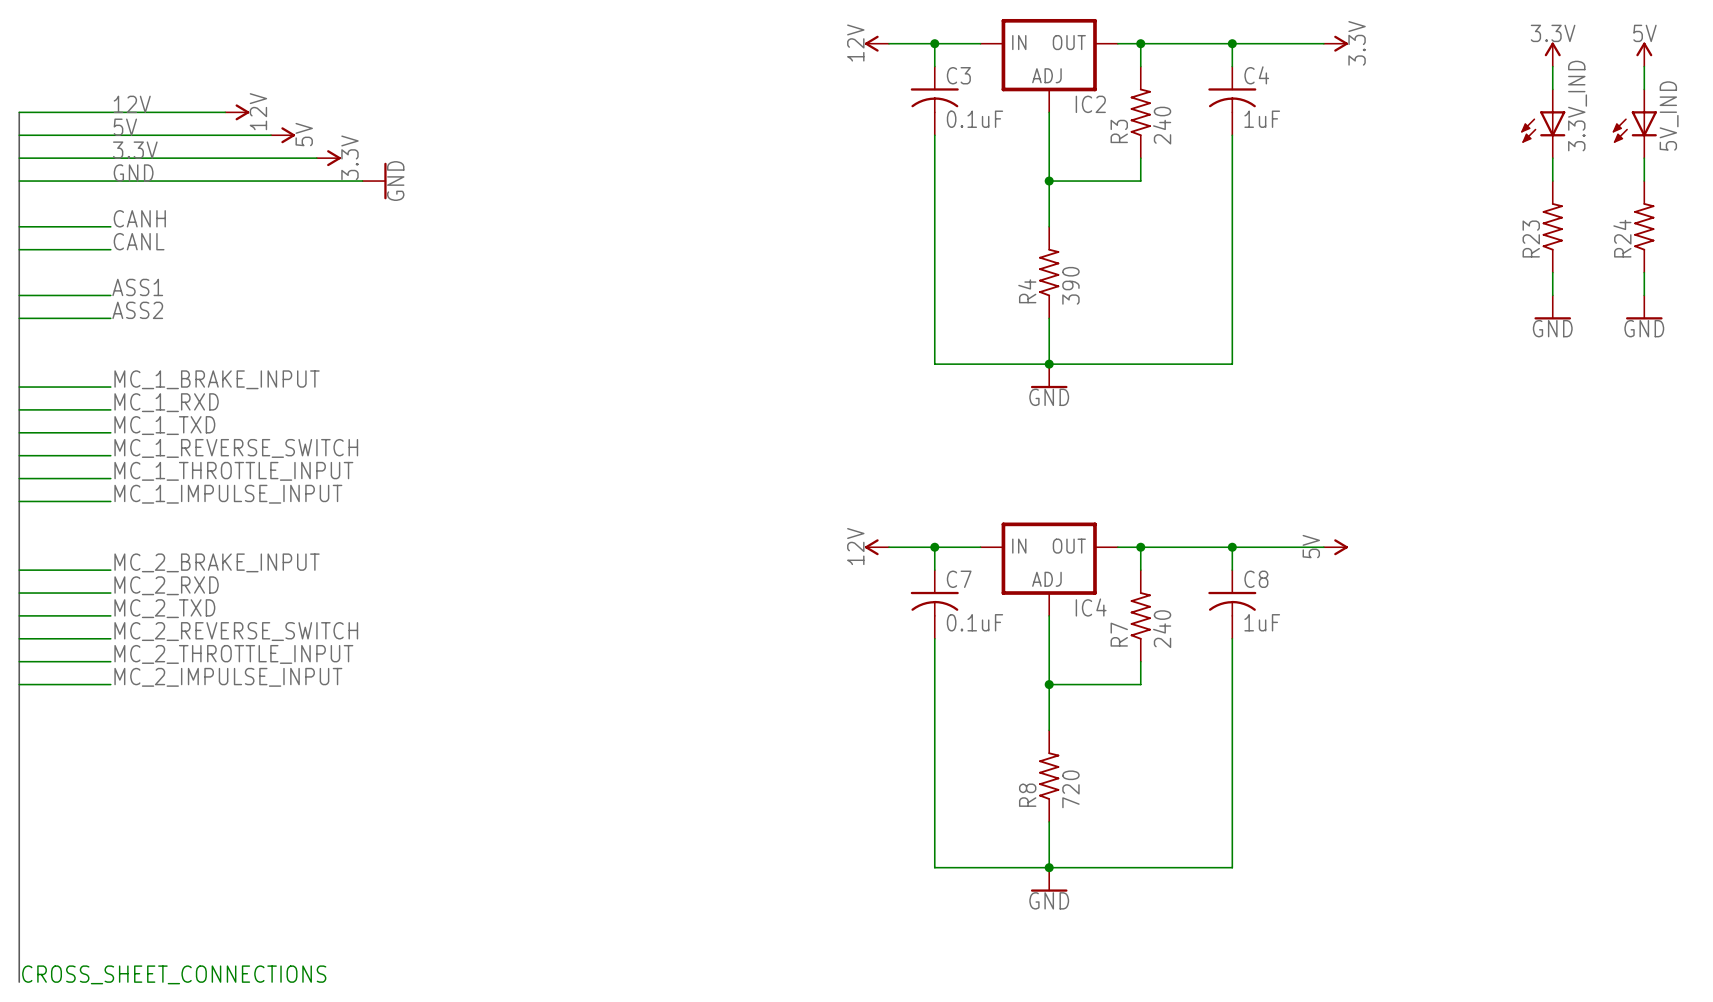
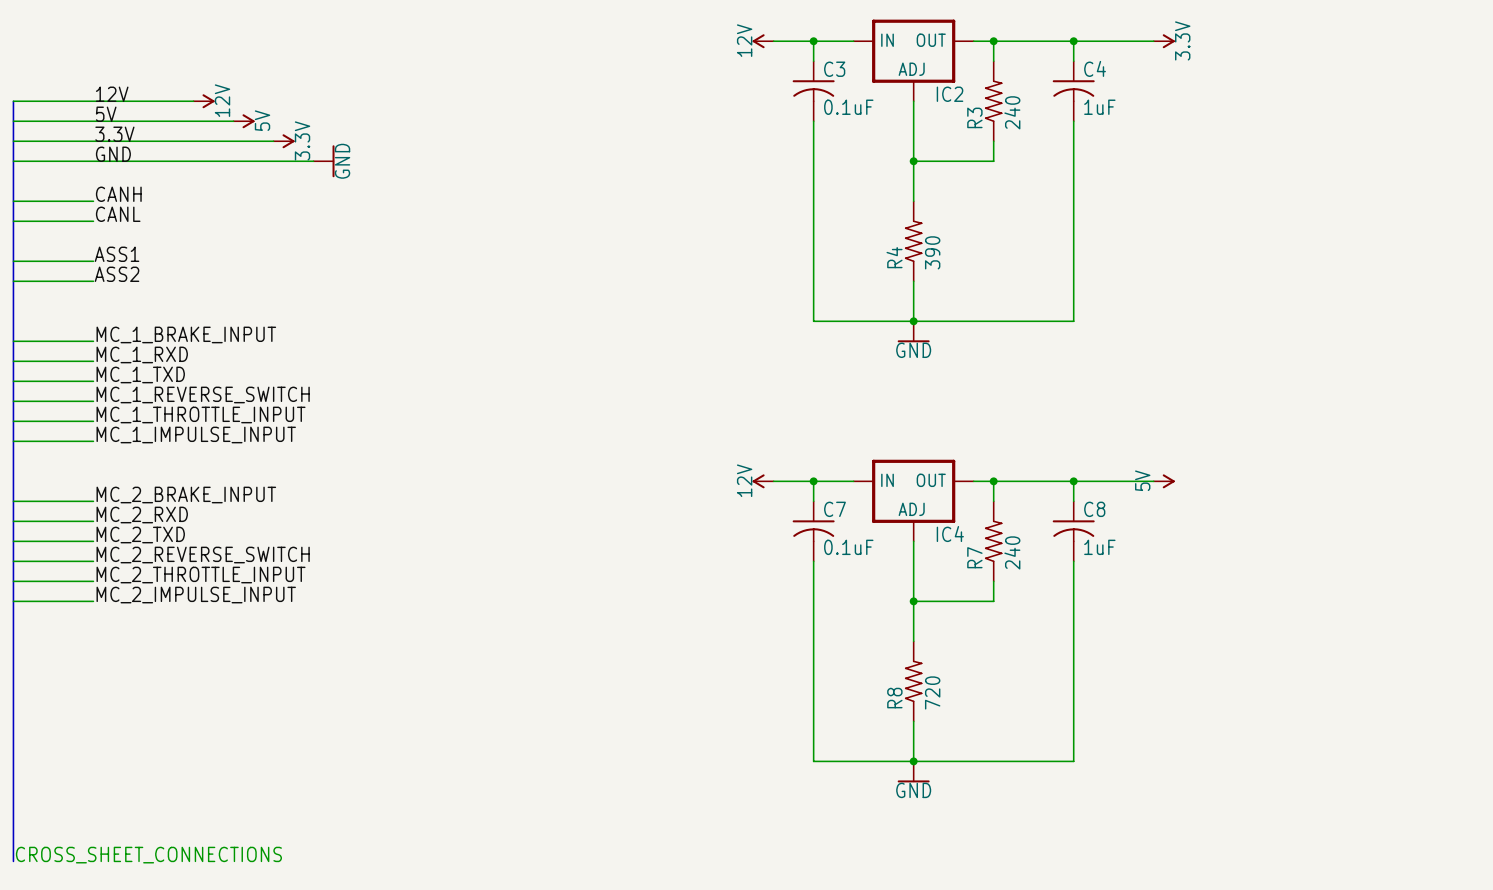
power symbol: 3.3V (1552, 54) -> none
power symbol: 5V (1644, 54) -> none
wire: (1552, 66) (1552, 89) -> none
wire: (1644, 66) (1644, 89) -> none
3.3V_IND: (1543, 123) -> none
5V_IND: (1634, 123) -> none
wire: (1552, 158) (1552, 181) -> none
wire: (1644, 158) (1644, 181) -> none
R23: (1552, 226) -> none
R24: (1644, 226) -> none
wire: (1552, 272) (1552, 295) -> none
wire: (1644, 272) (1644, 295) -> none
power symbol: GND (1552, 307) -> none
power symbol: GND (1644, 307) -> none

